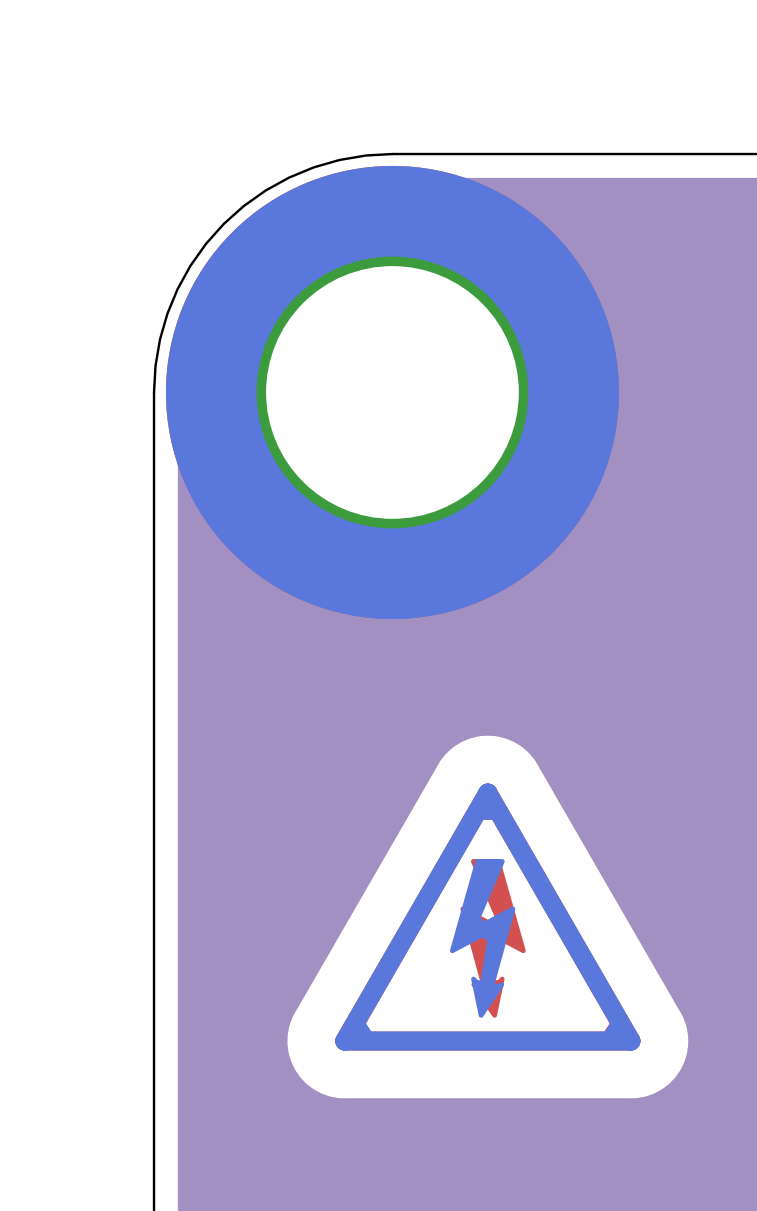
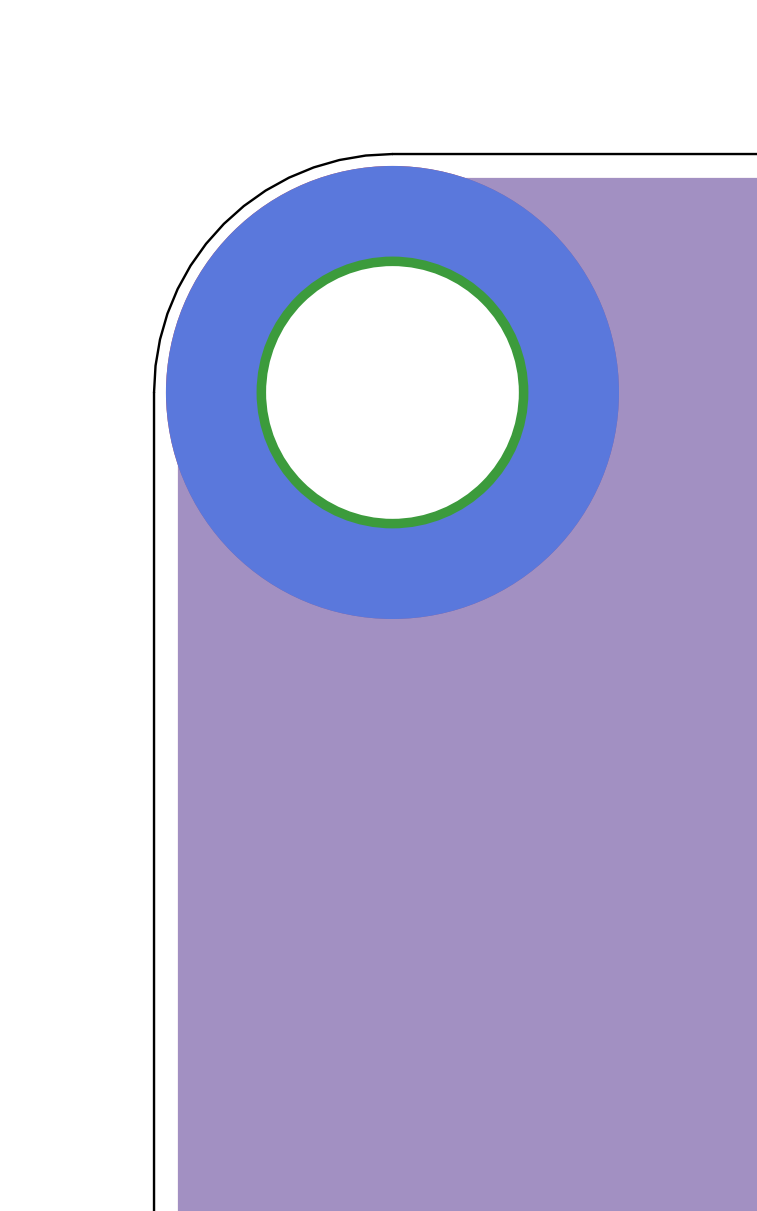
drawing: [335, 783, 641, 1051] -> none

